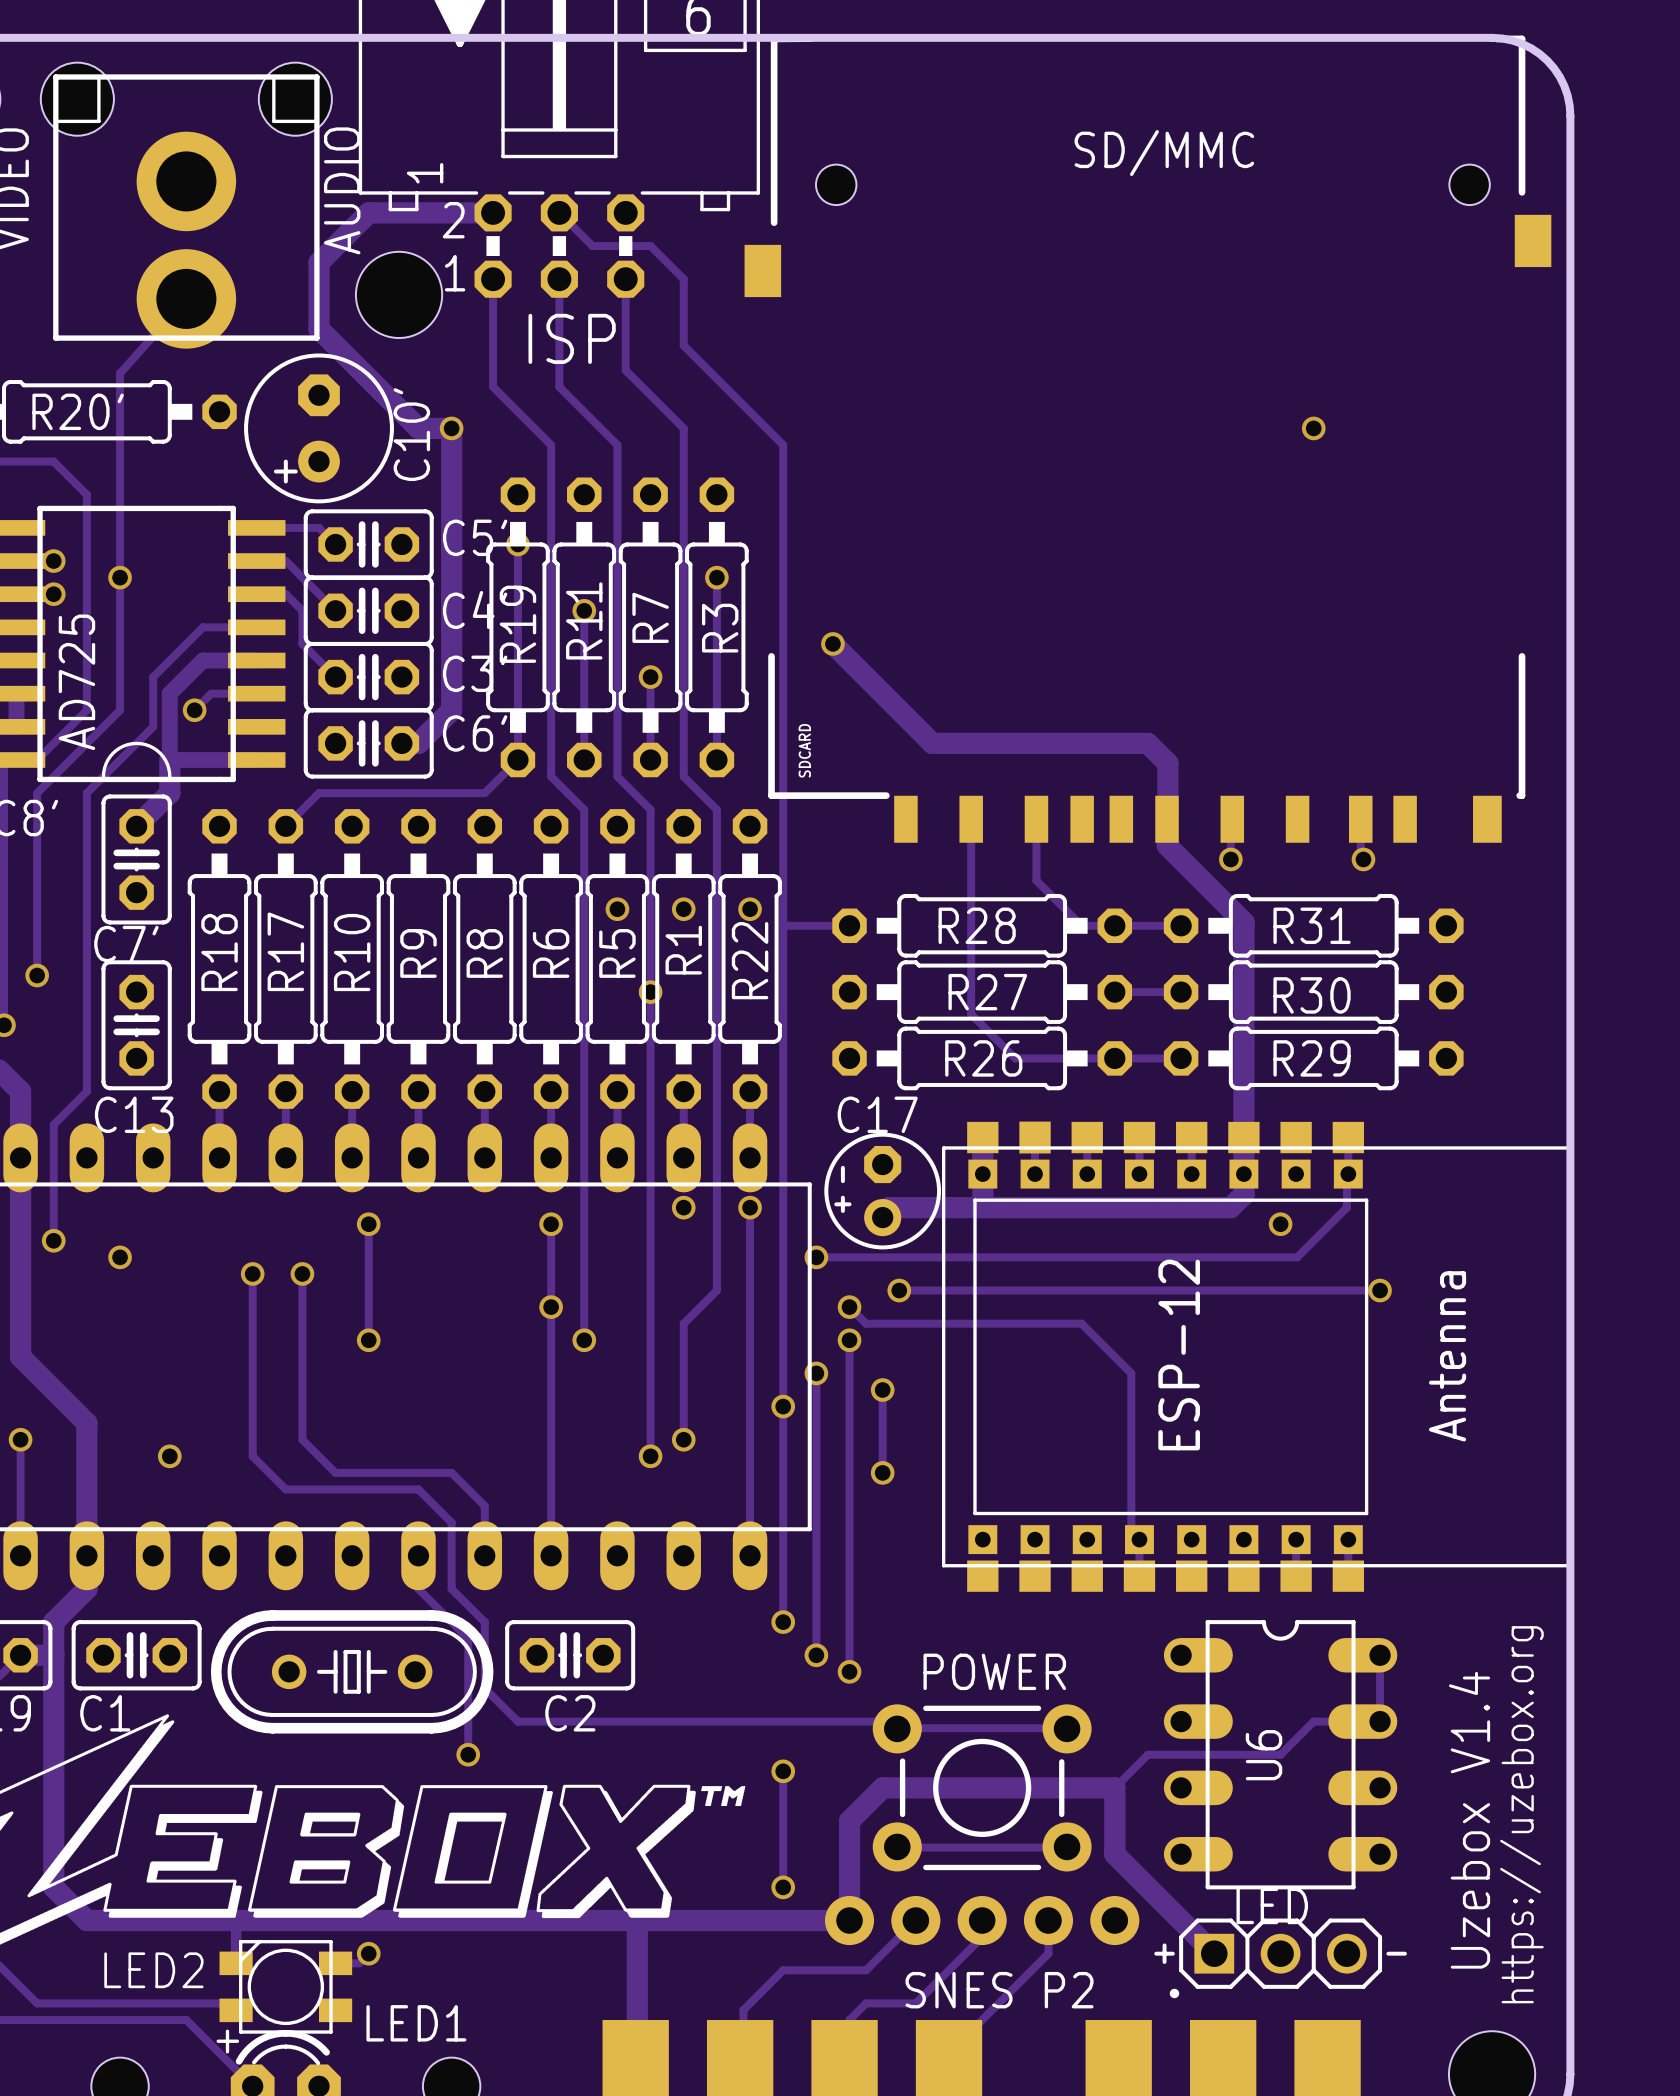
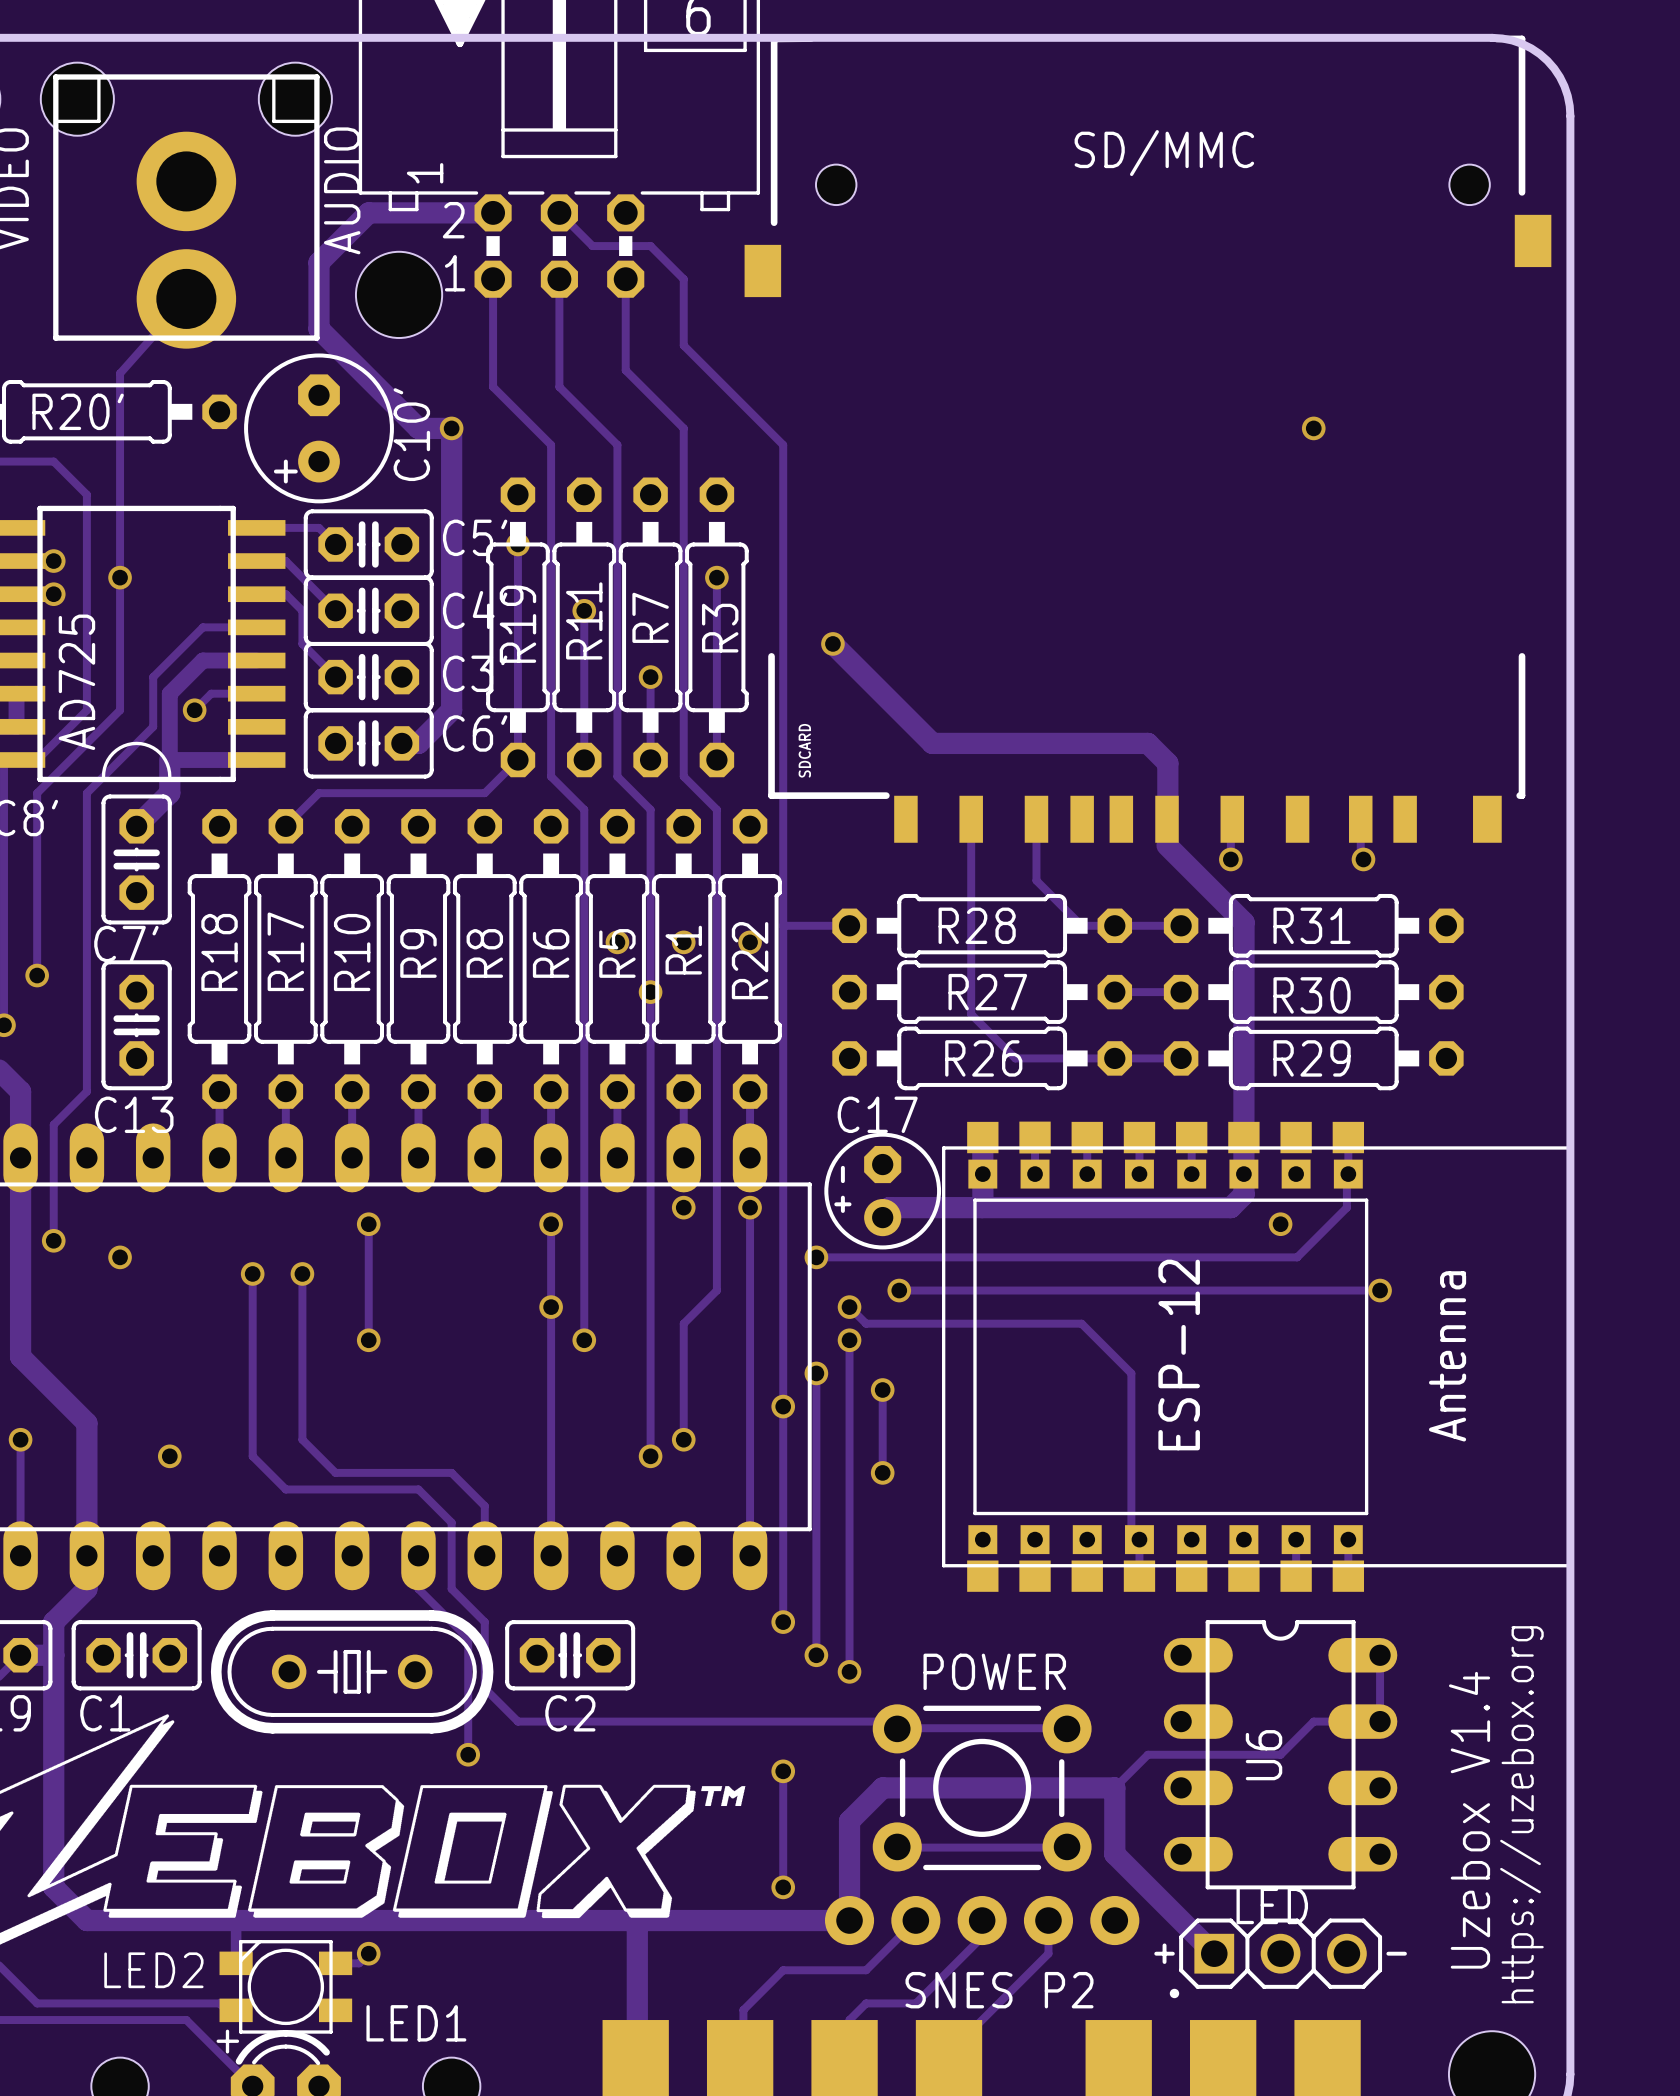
text: ISP (572, 338) -> none
via position: (617, 909) -> (617, 942)
via position: (683, 909) -> (683, 942)
via position: (750, 909) -> (750, 942)

